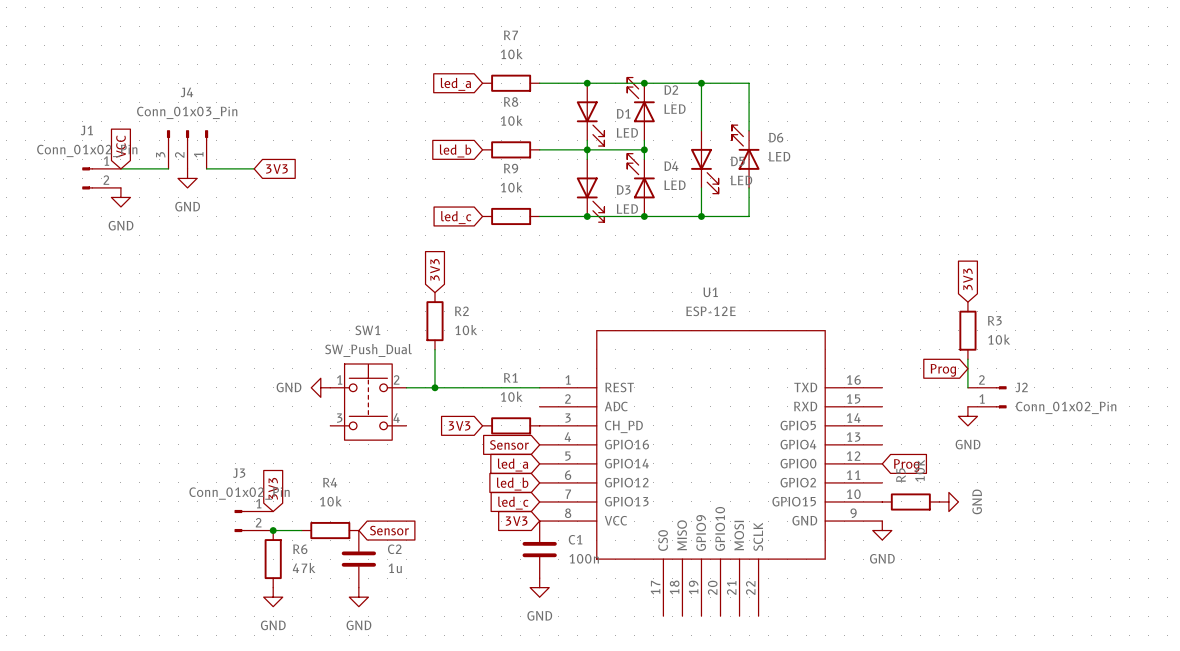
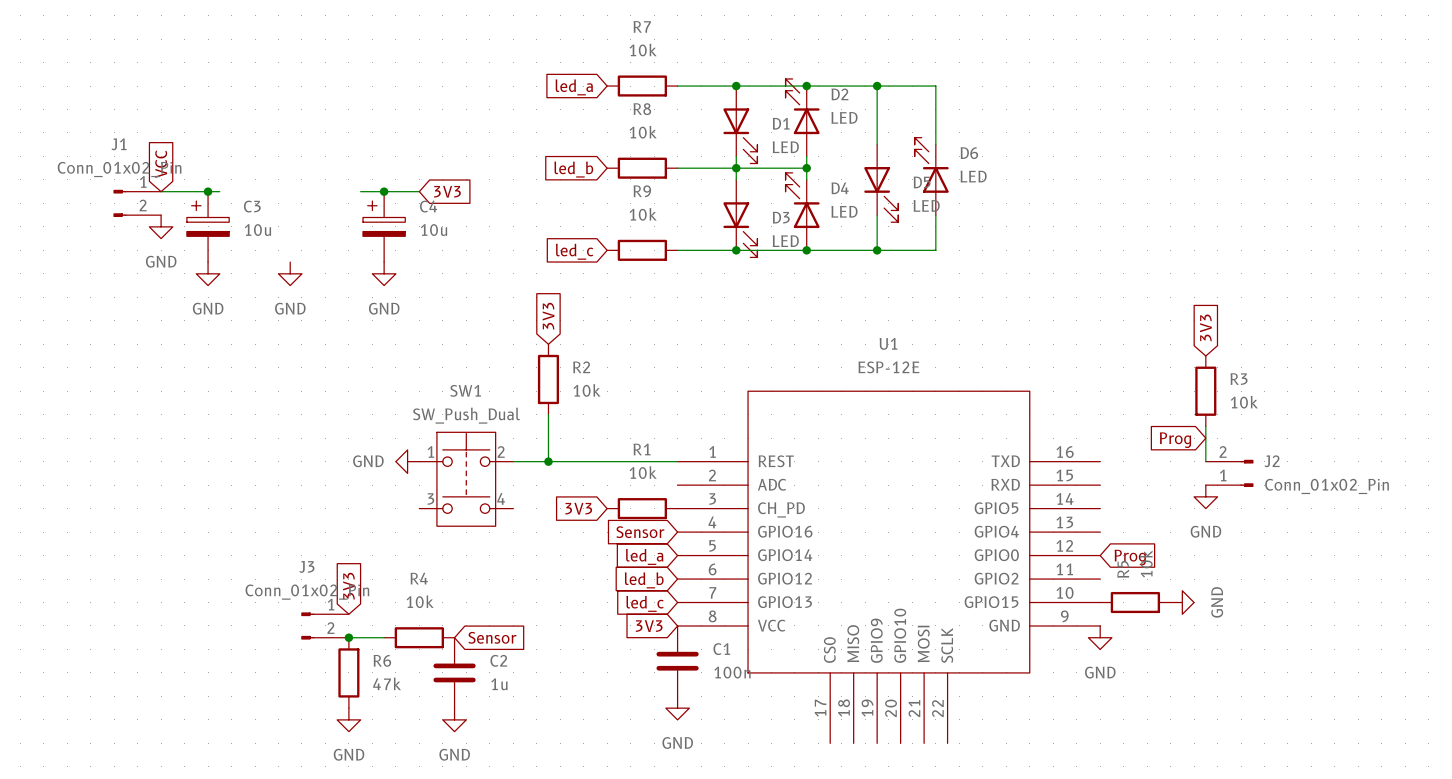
J4: Conn_01x03_Pin (187, 149) -> none
junction: none -> (208, 191)
wire: (206, 168) (254, 168) -> (360, 191) (419, 191)
global label position: 3V3 (276, 168) -> 3V3 (447, 191)
junction: none -> (384, 191)
power symbol: GND (187, 178) -> none
C3: none -> 10u (208, 226)
C4: none -> 10u (384, 226)
power symbol: none -> GND (208, 273)
power symbol: none -> GND (290, 273)
power symbol: none -> GND (384, 273)

